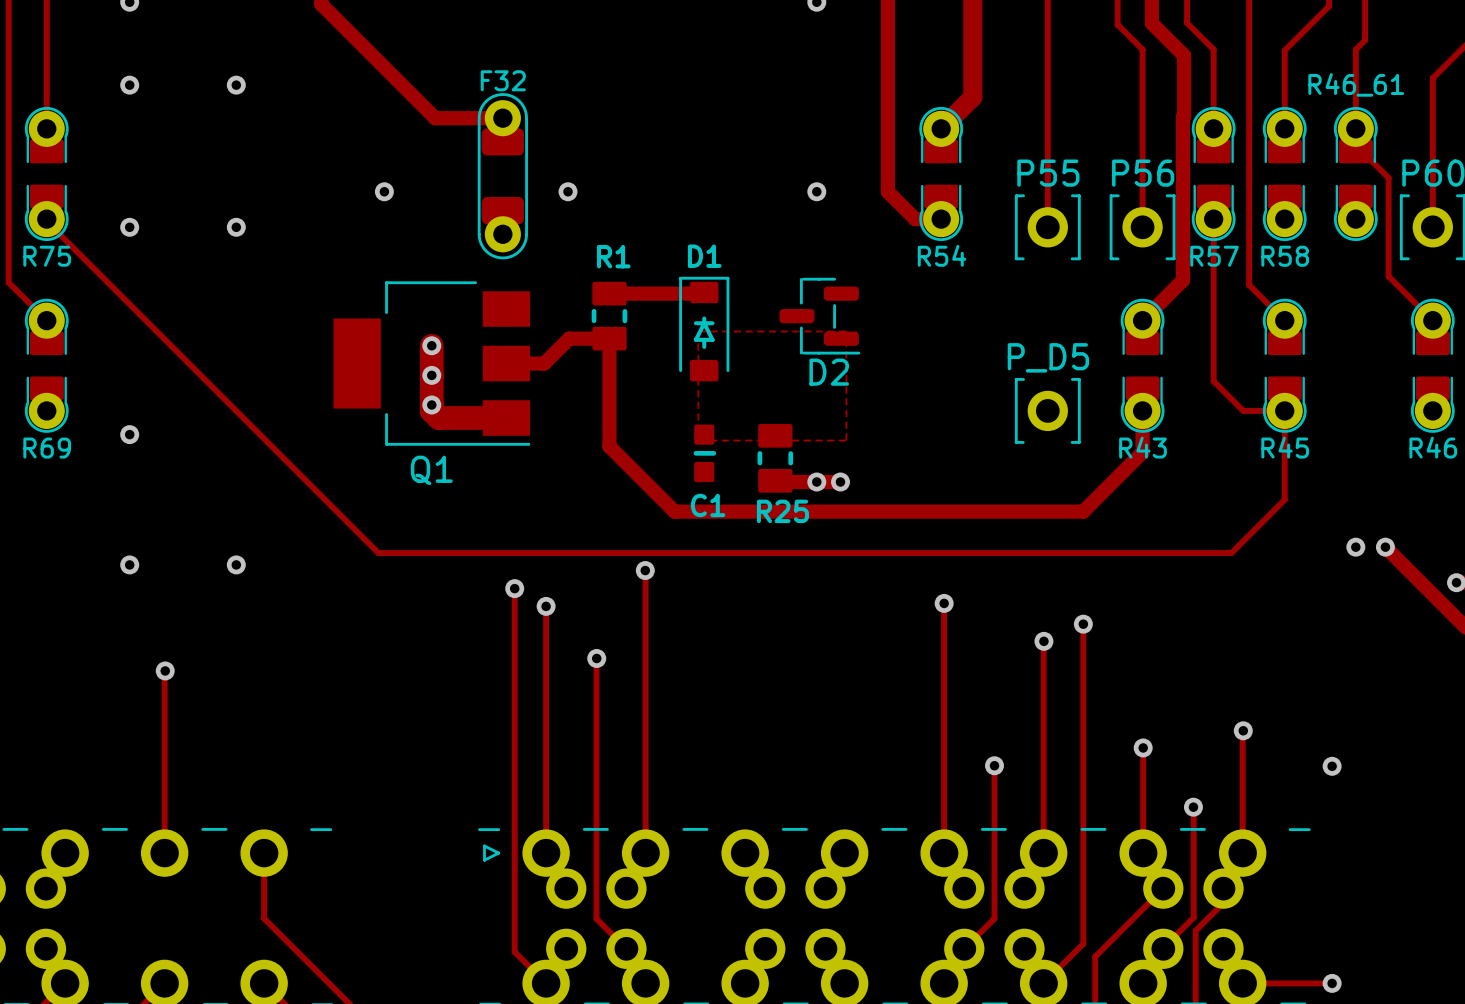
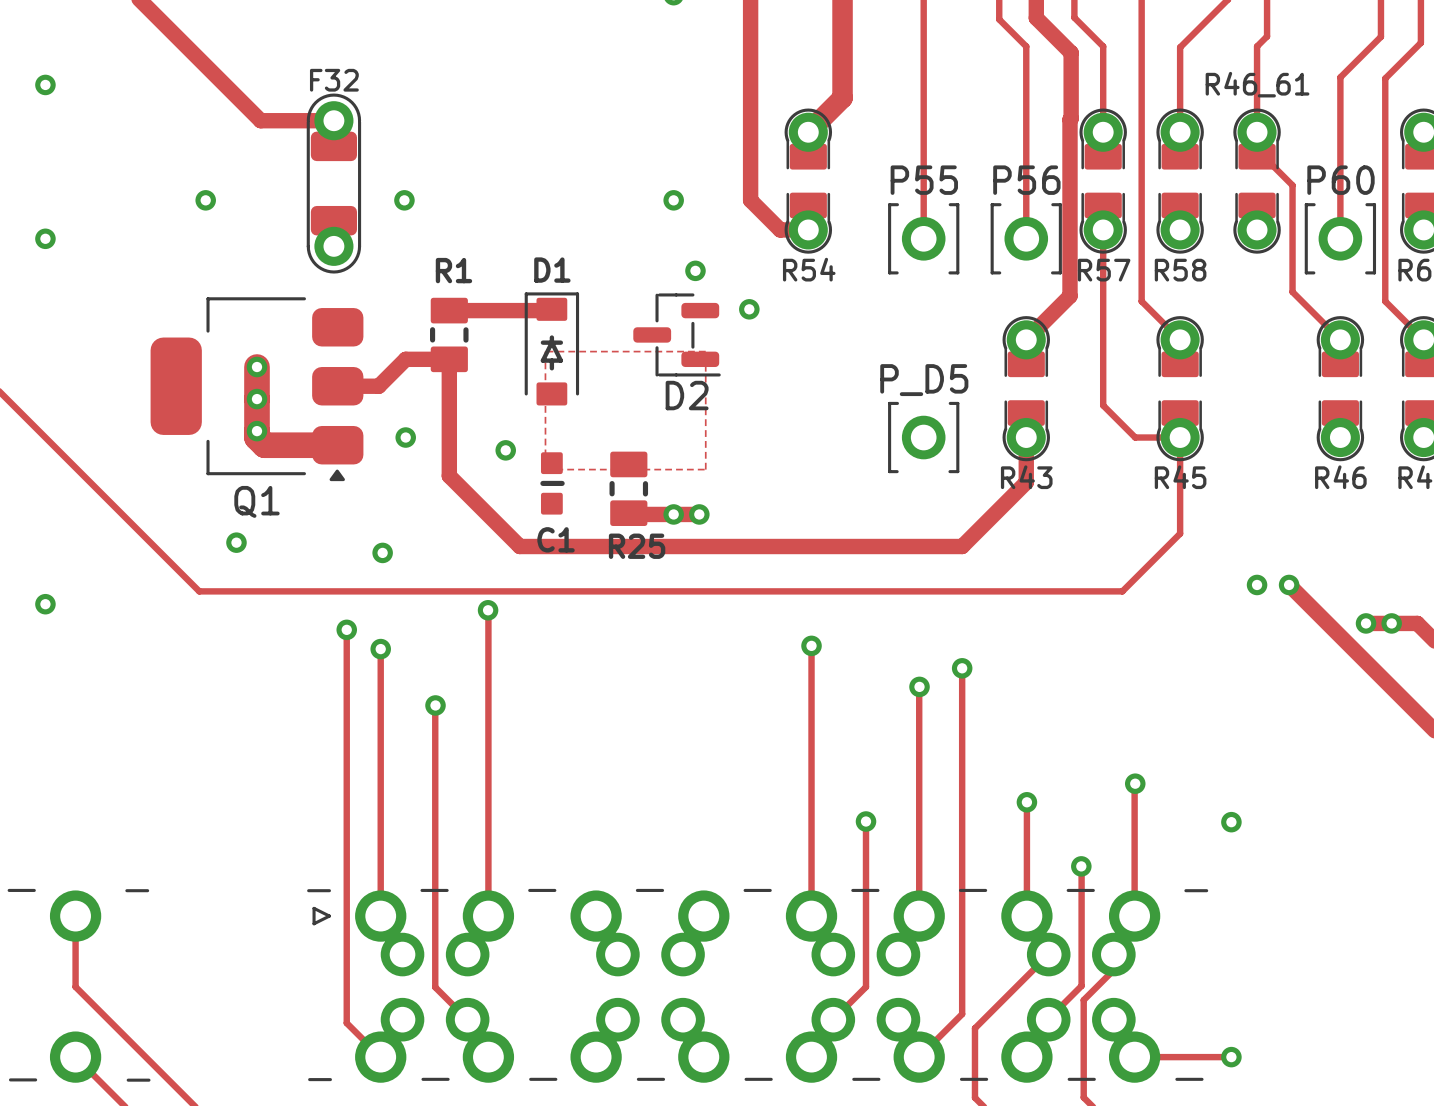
via: none -> (695, 270)
Q1 footprint: [333, 281, 531, 446] -> [150, 297, 364, 482]
via: none -> (749, 309)
via: none -> (405, 437)
via: none -> (505, 450)
via: none -> (236, 542)
via: none -> (382, 552)

